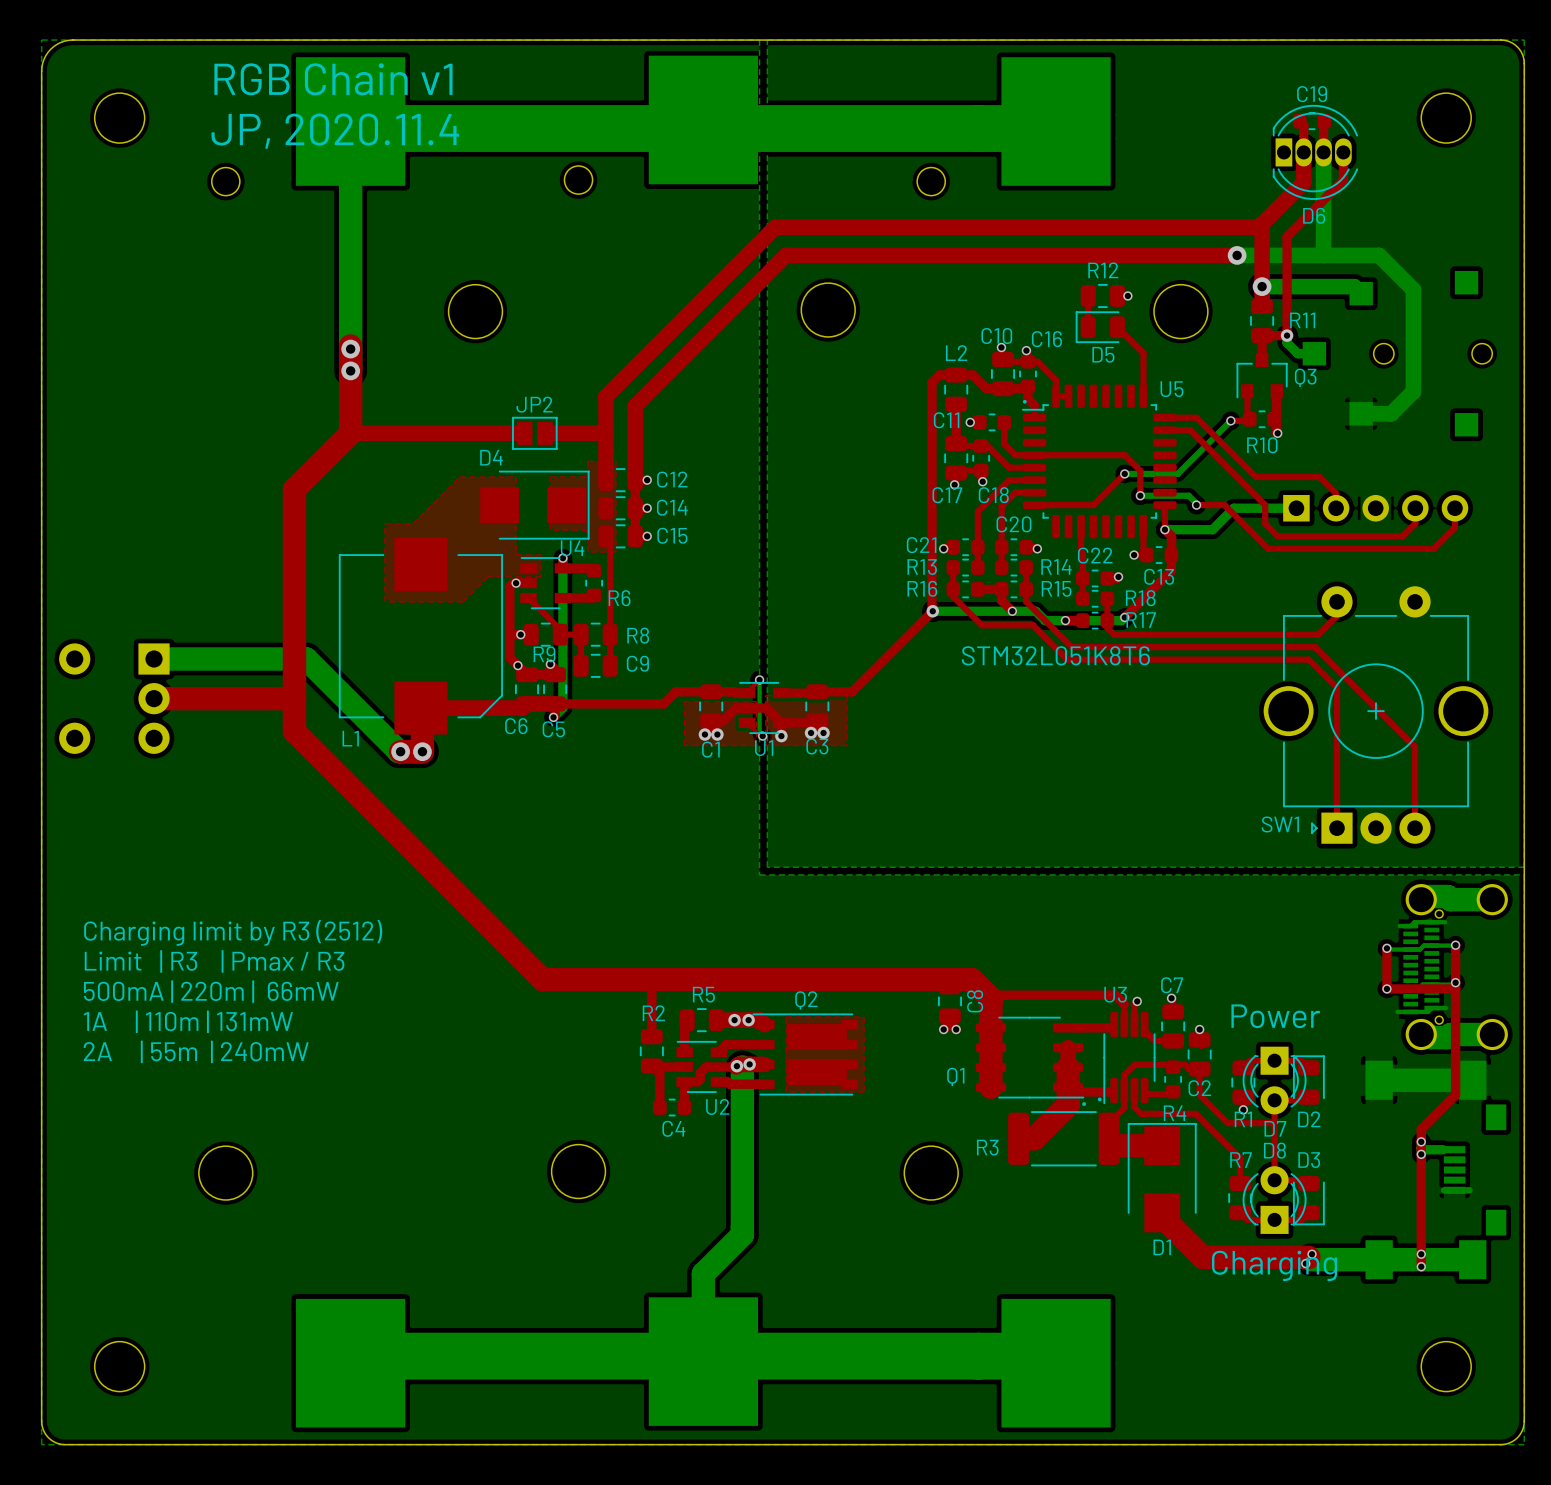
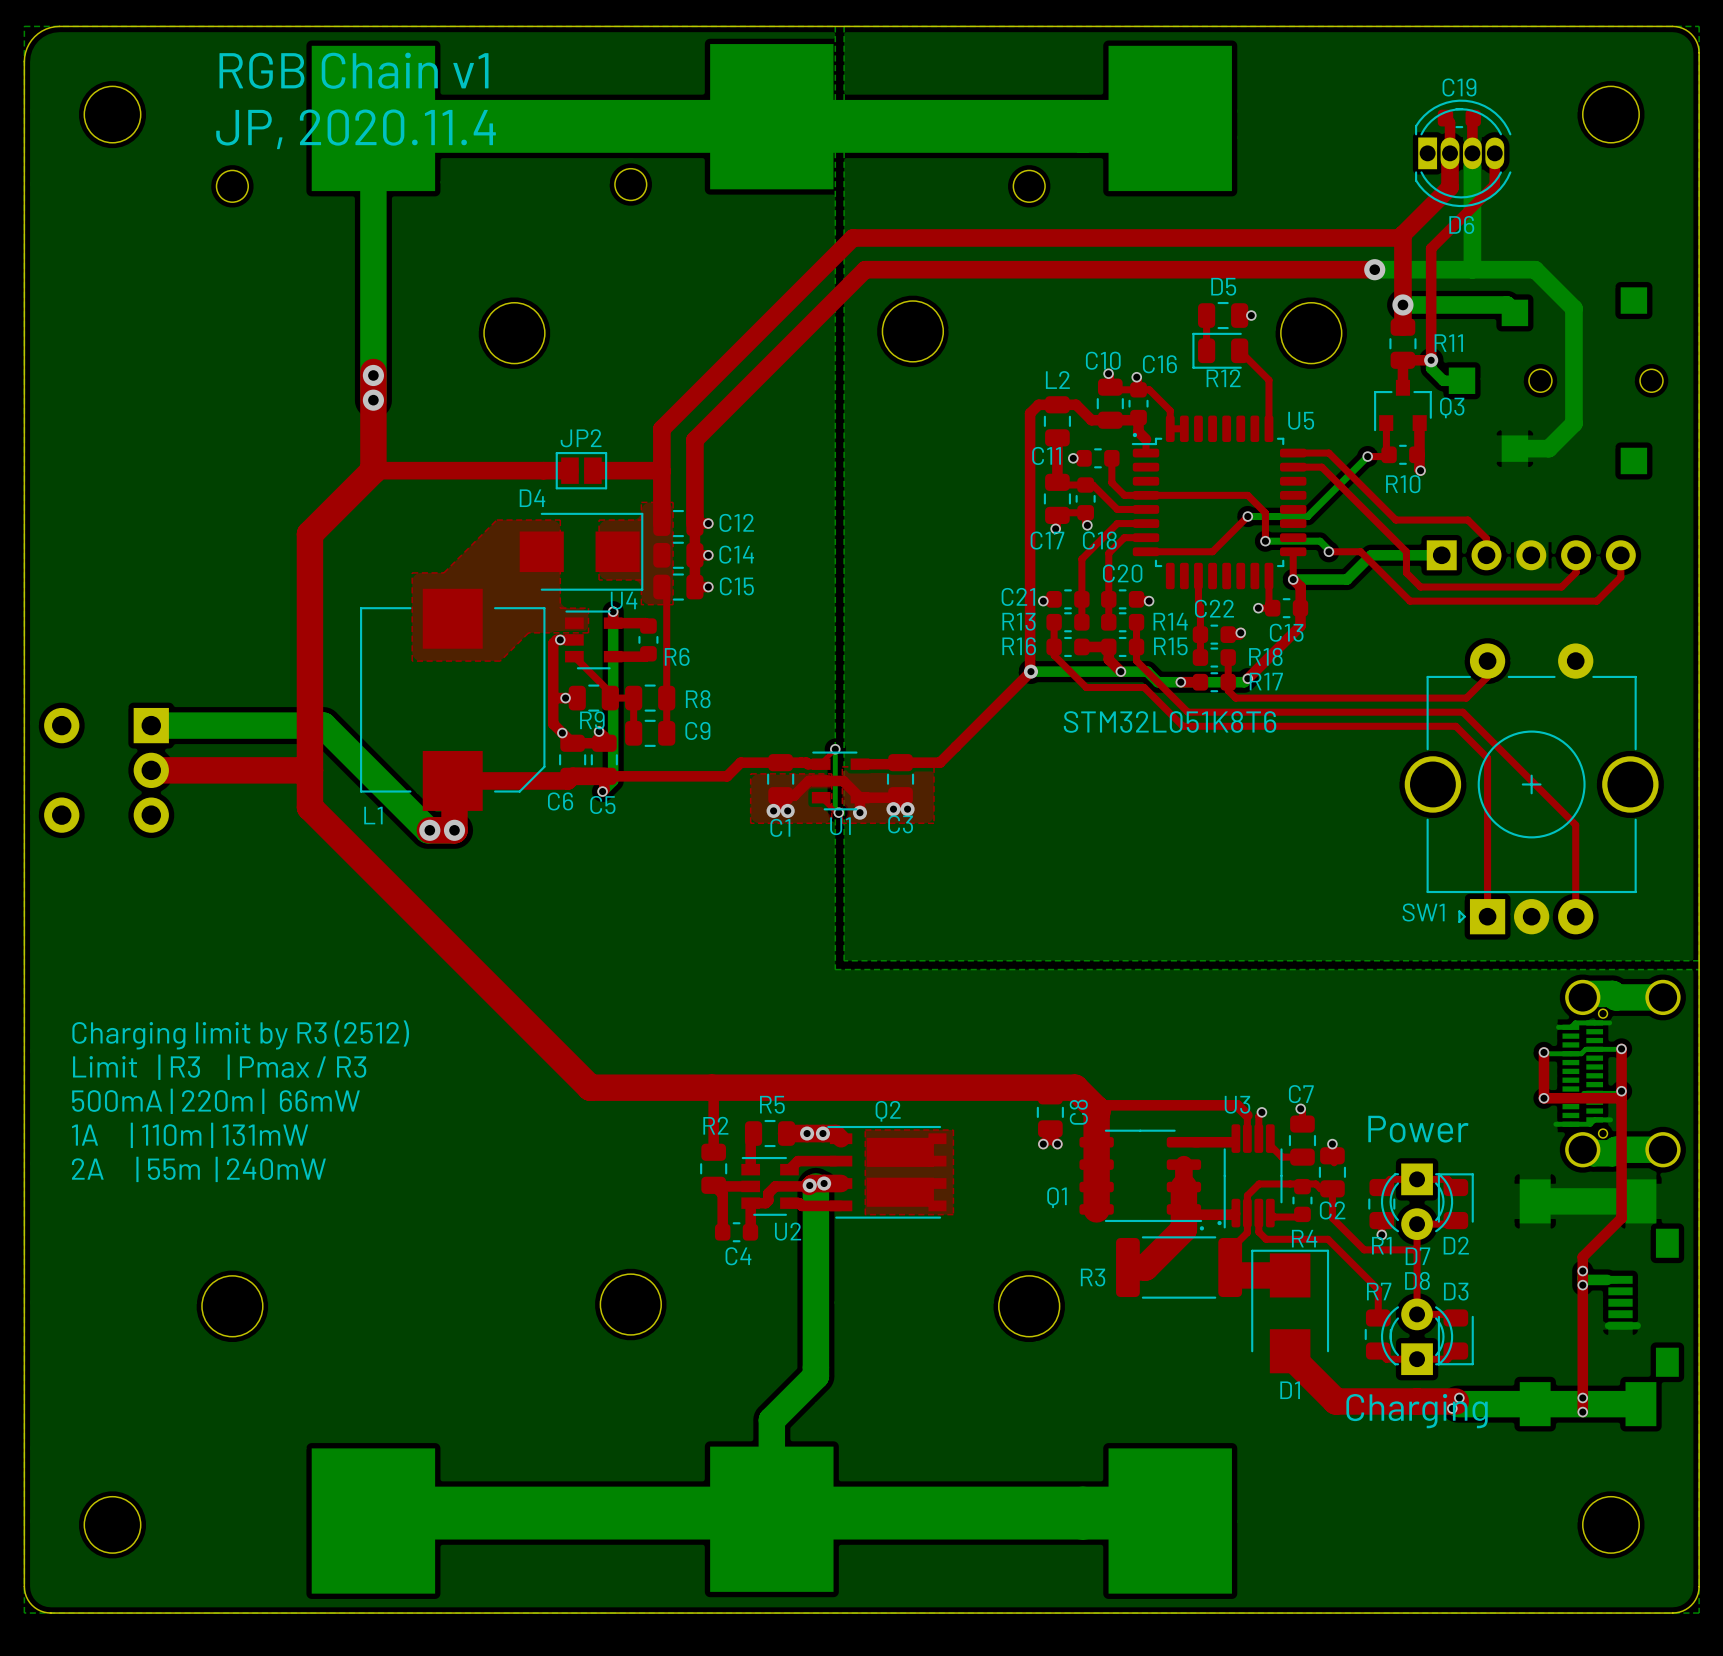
R12 name position: R12 (1103, 270) -> R12 (1223, 378)
D5 name position: D5 (1103, 354) -> D5 (1223, 286)

